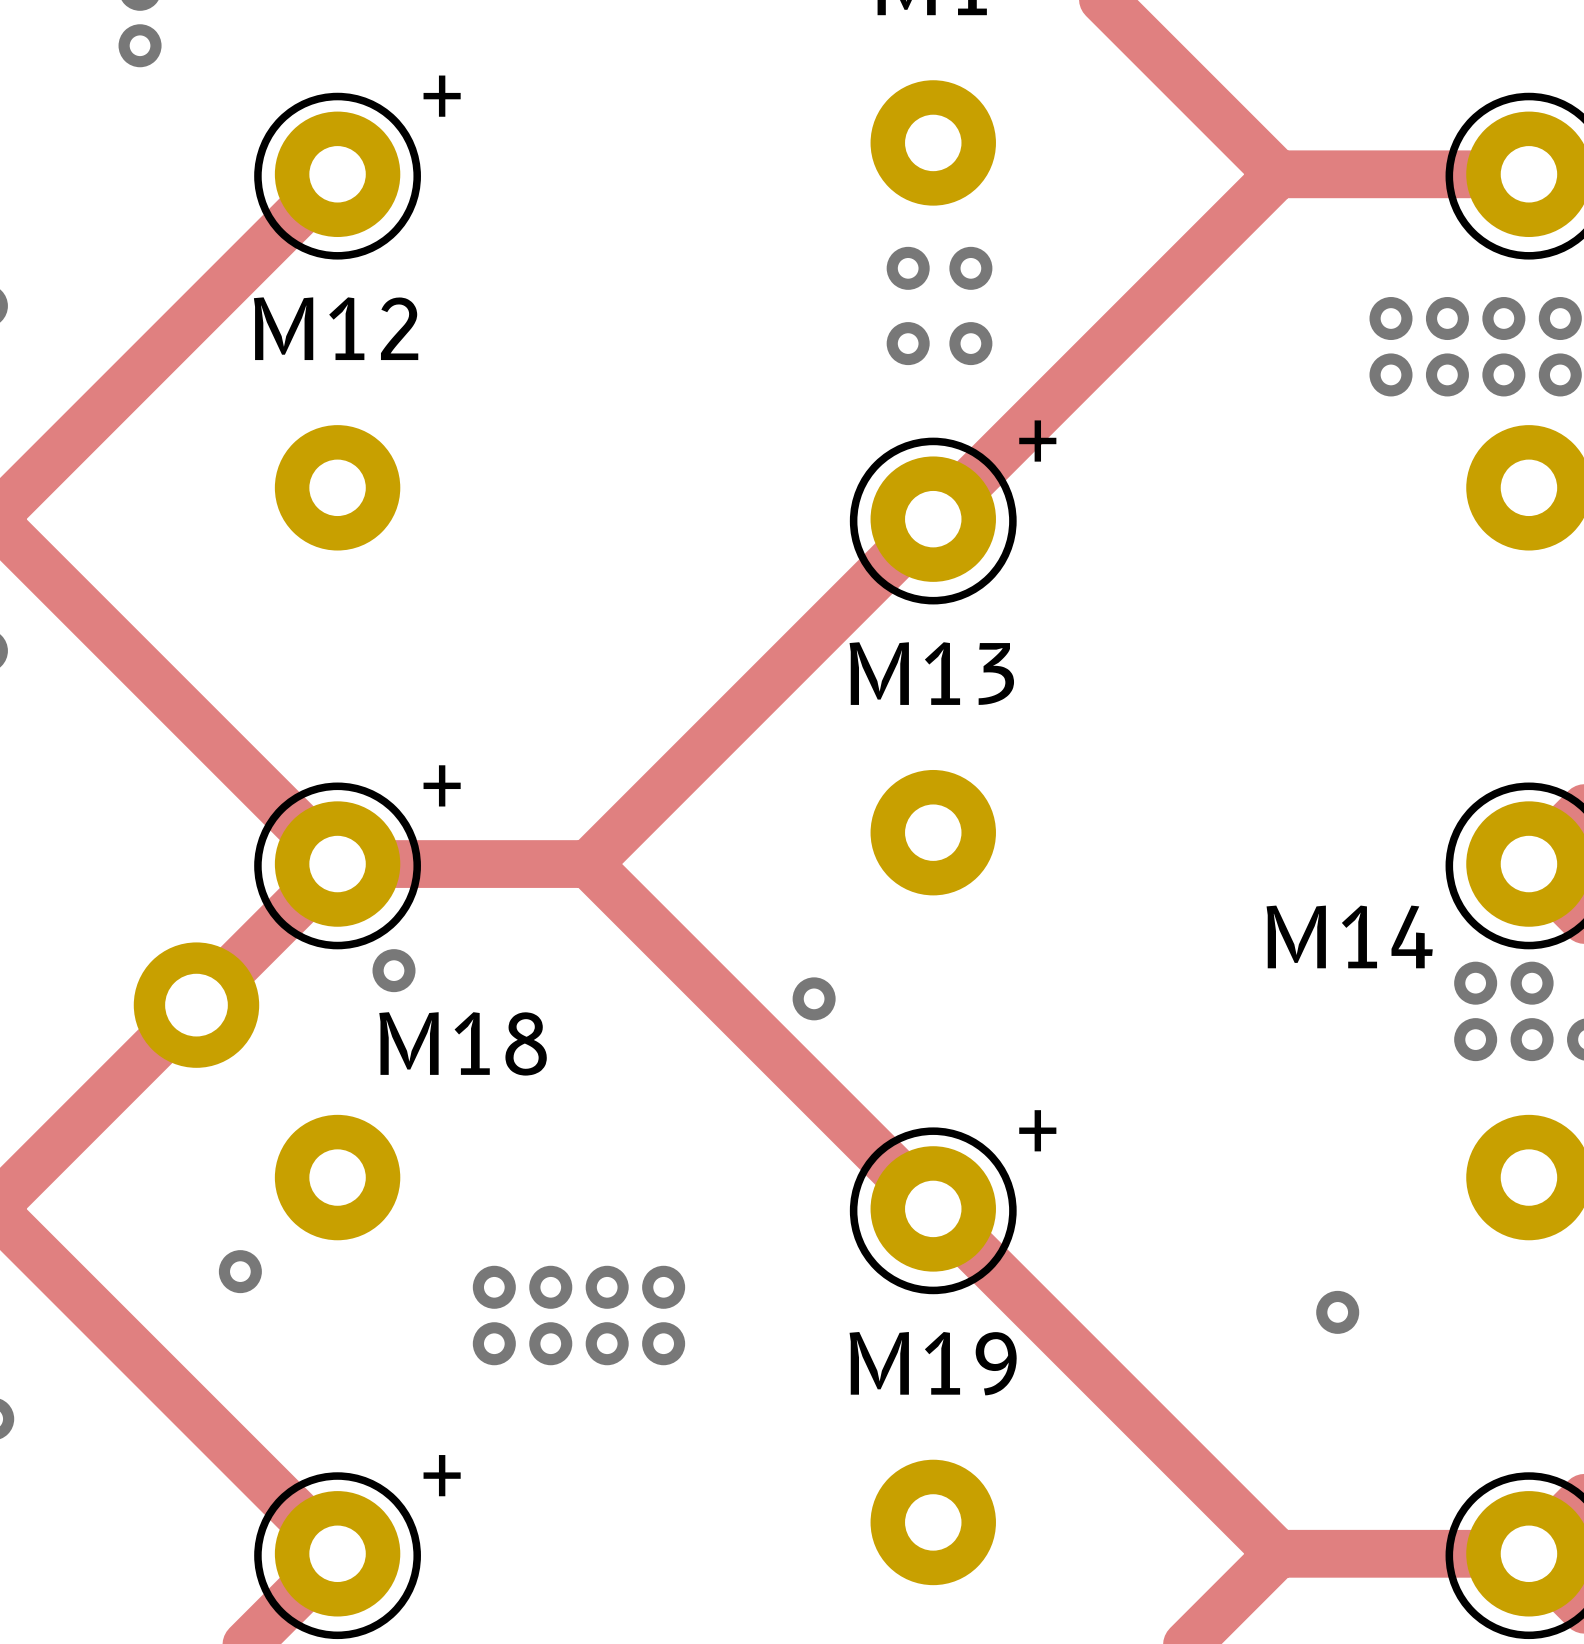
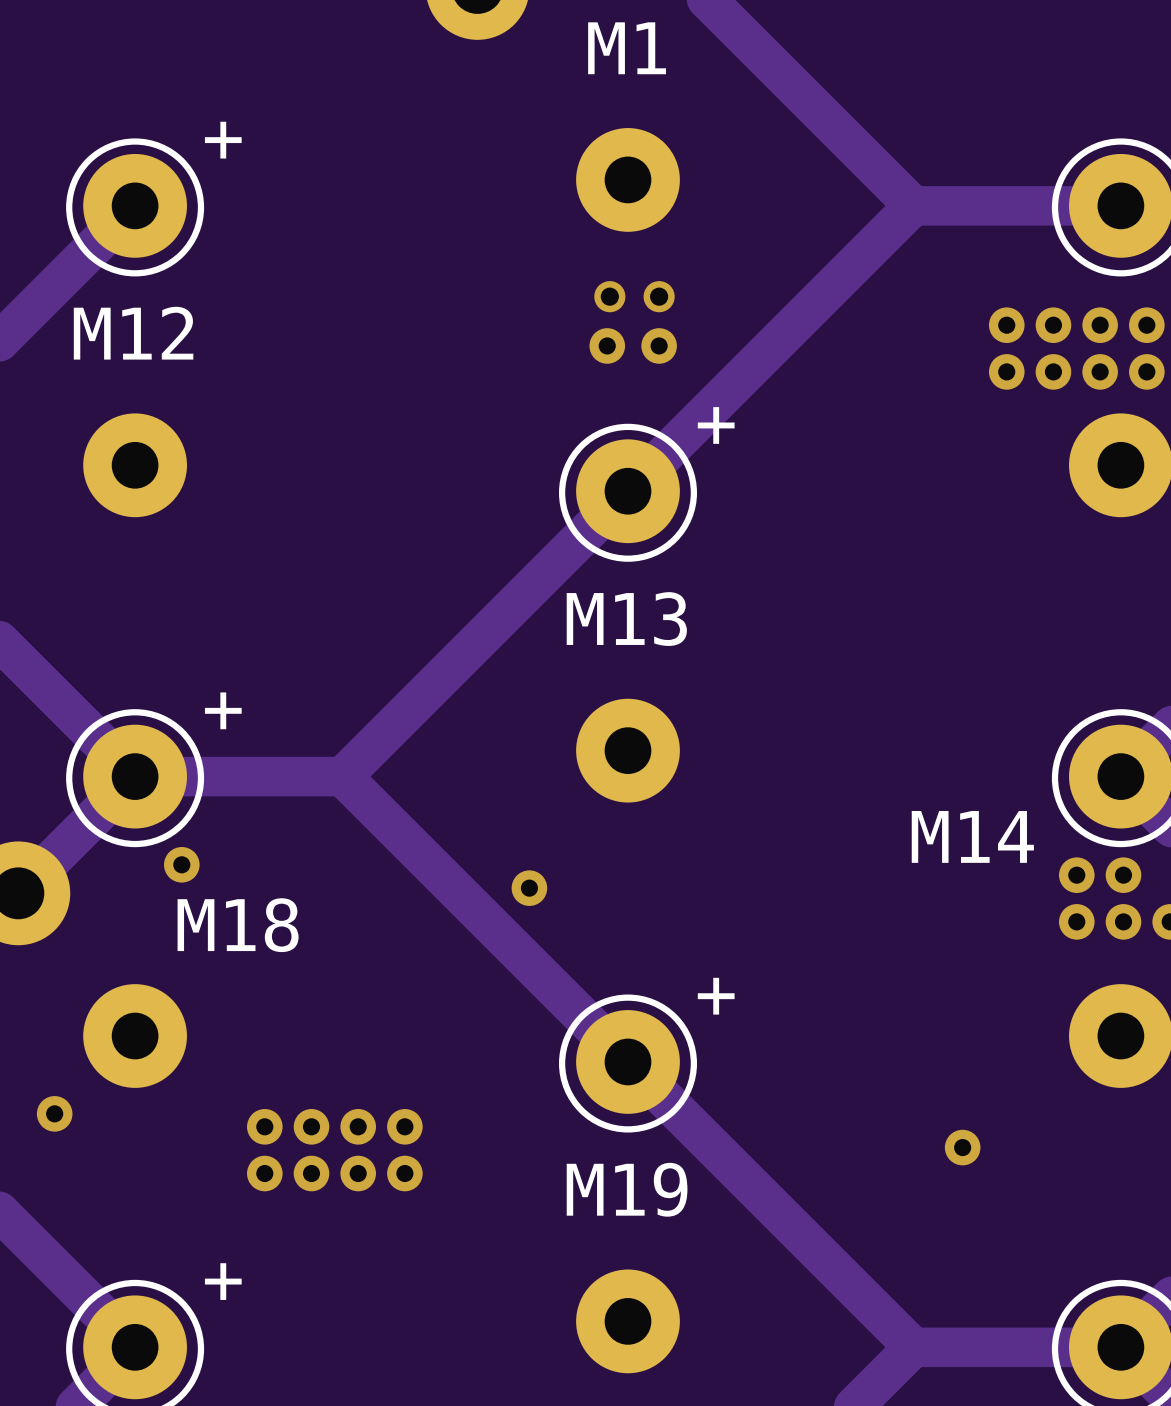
via position: (908, 268) -> (609, 296)
via position: (970, 268) -> (659, 296)

